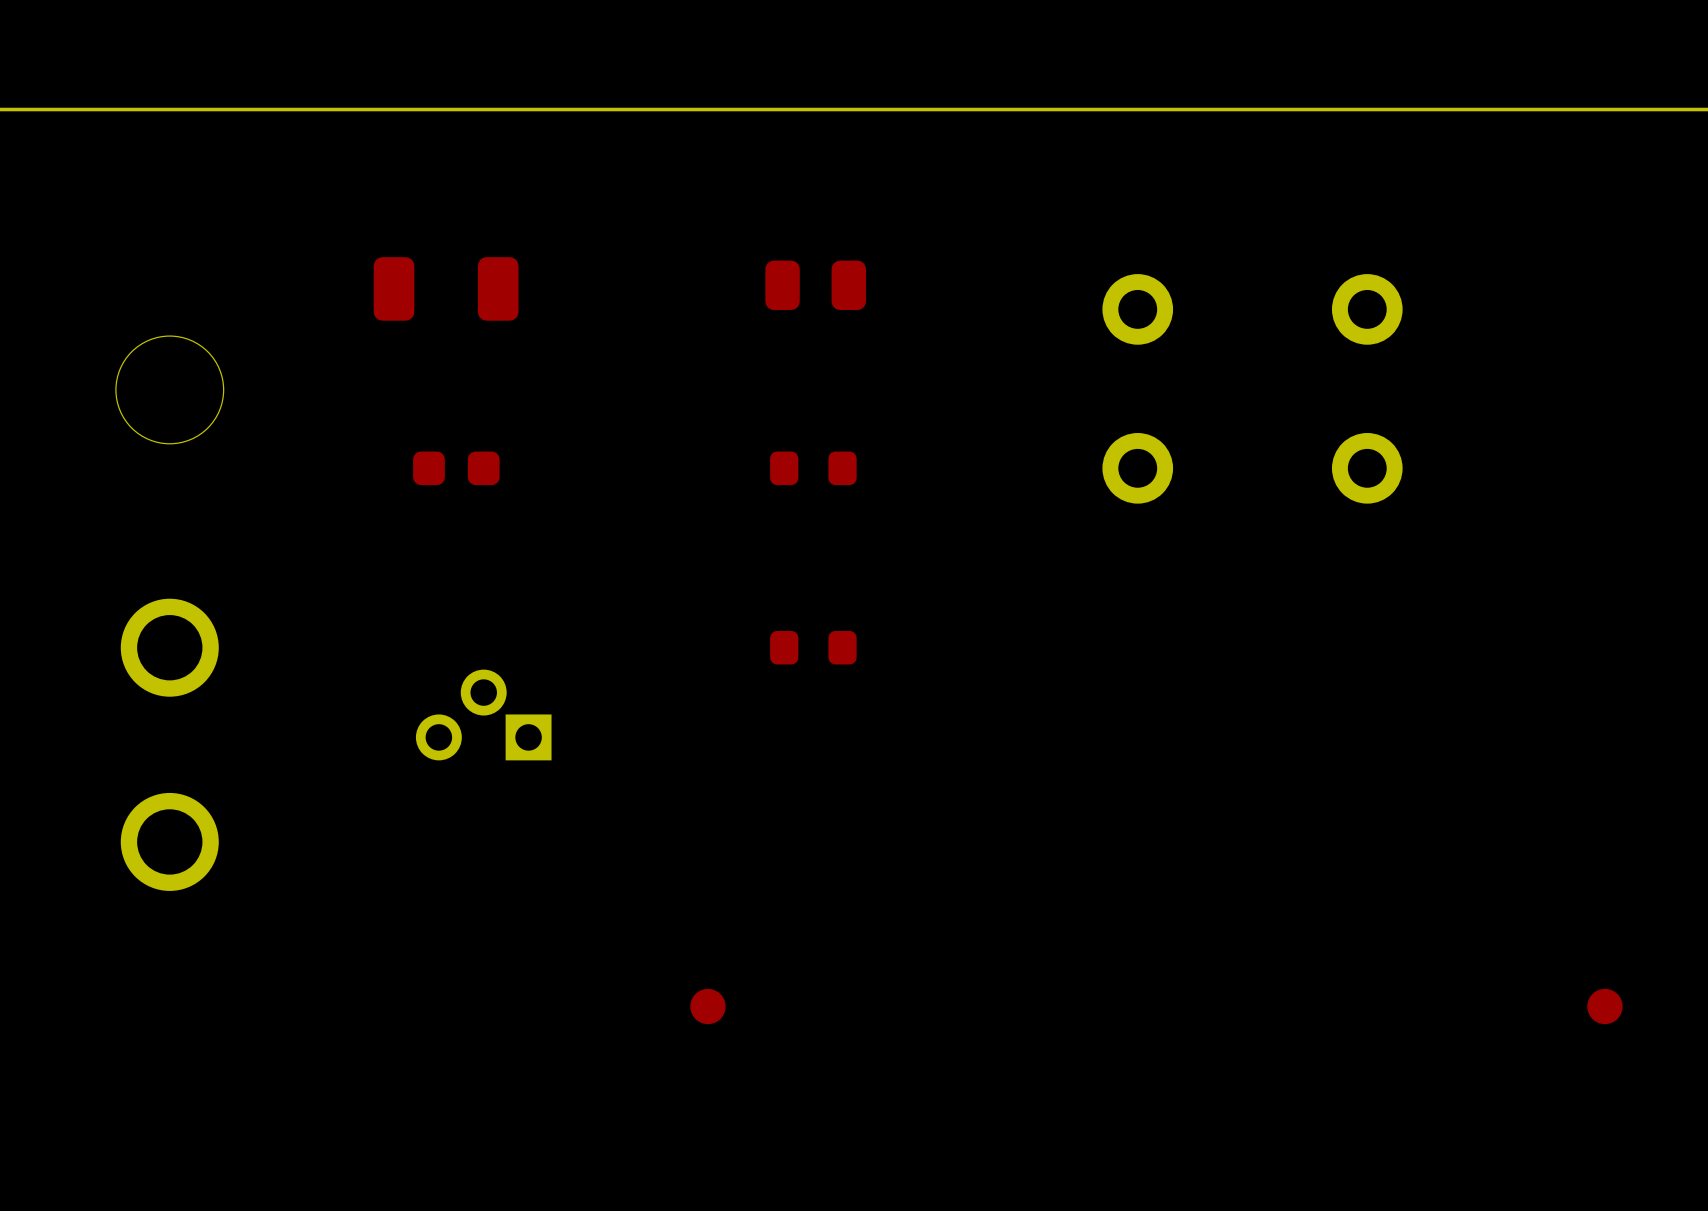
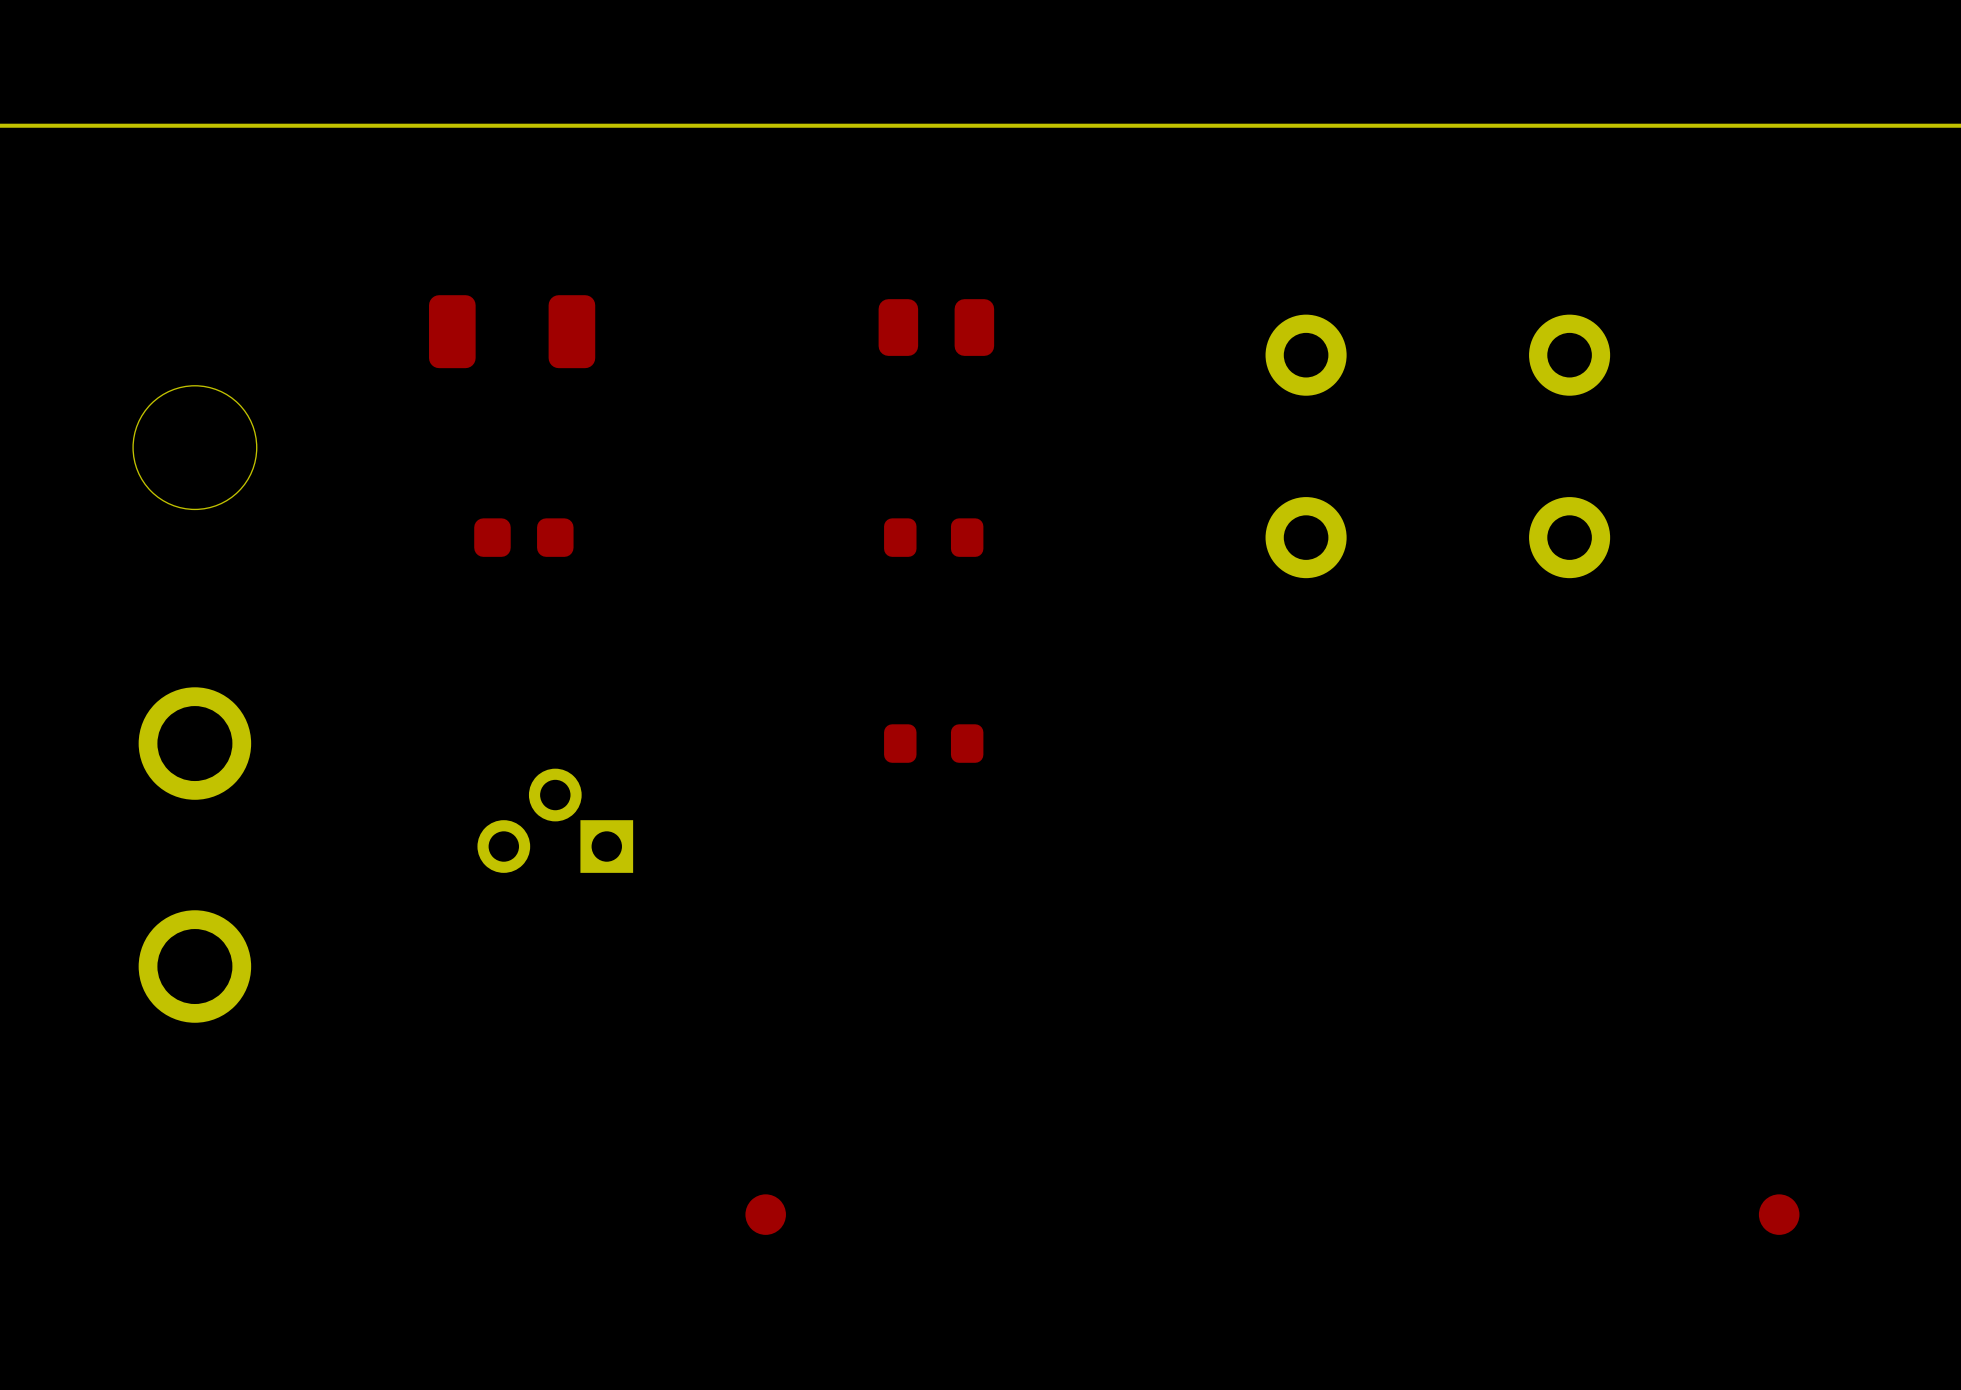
part position: (707, 1006) -> (765, 1214)
part position: (1604, 1006) -> (1779, 1214)

